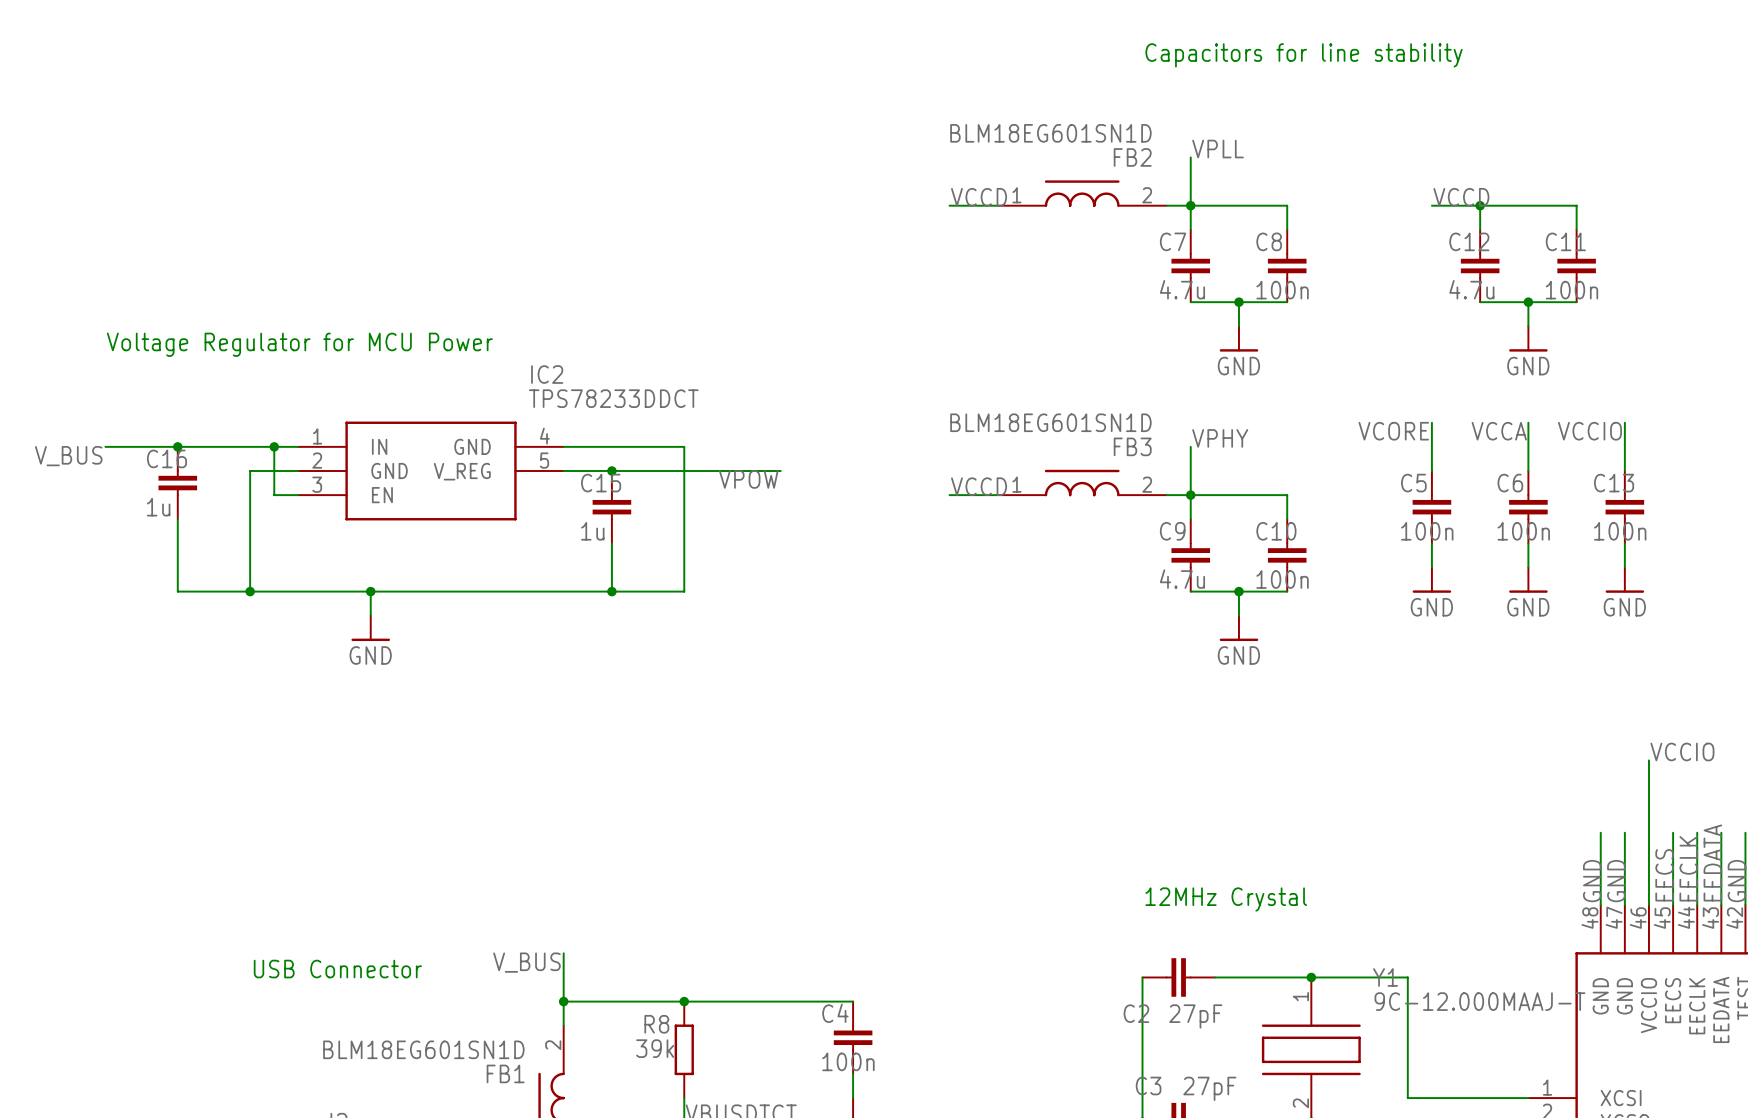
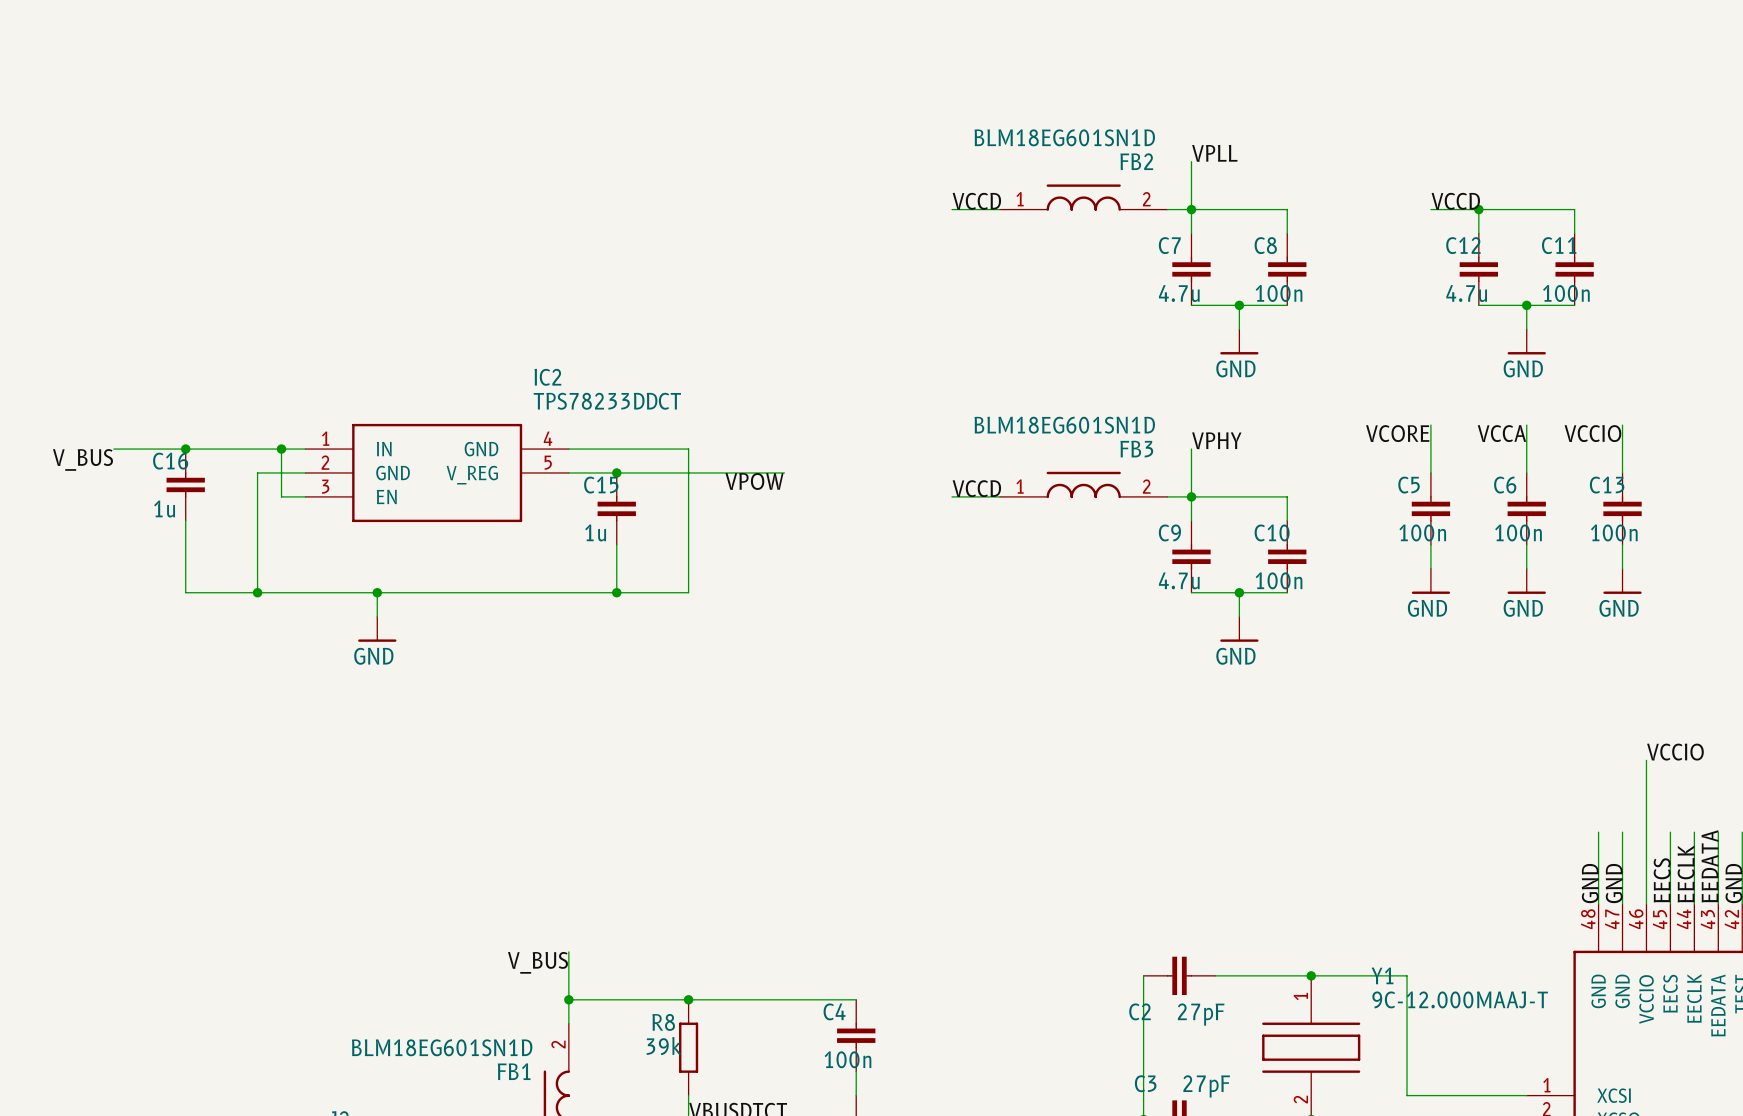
text: Capacitors for line stability (1304, 55) -> none
text: Voltage Regulator for MCU Power (299, 344) -> none
text: 12MHz Crystal (1226, 899) -> none
text: USB Connector (337, 969) -> none

